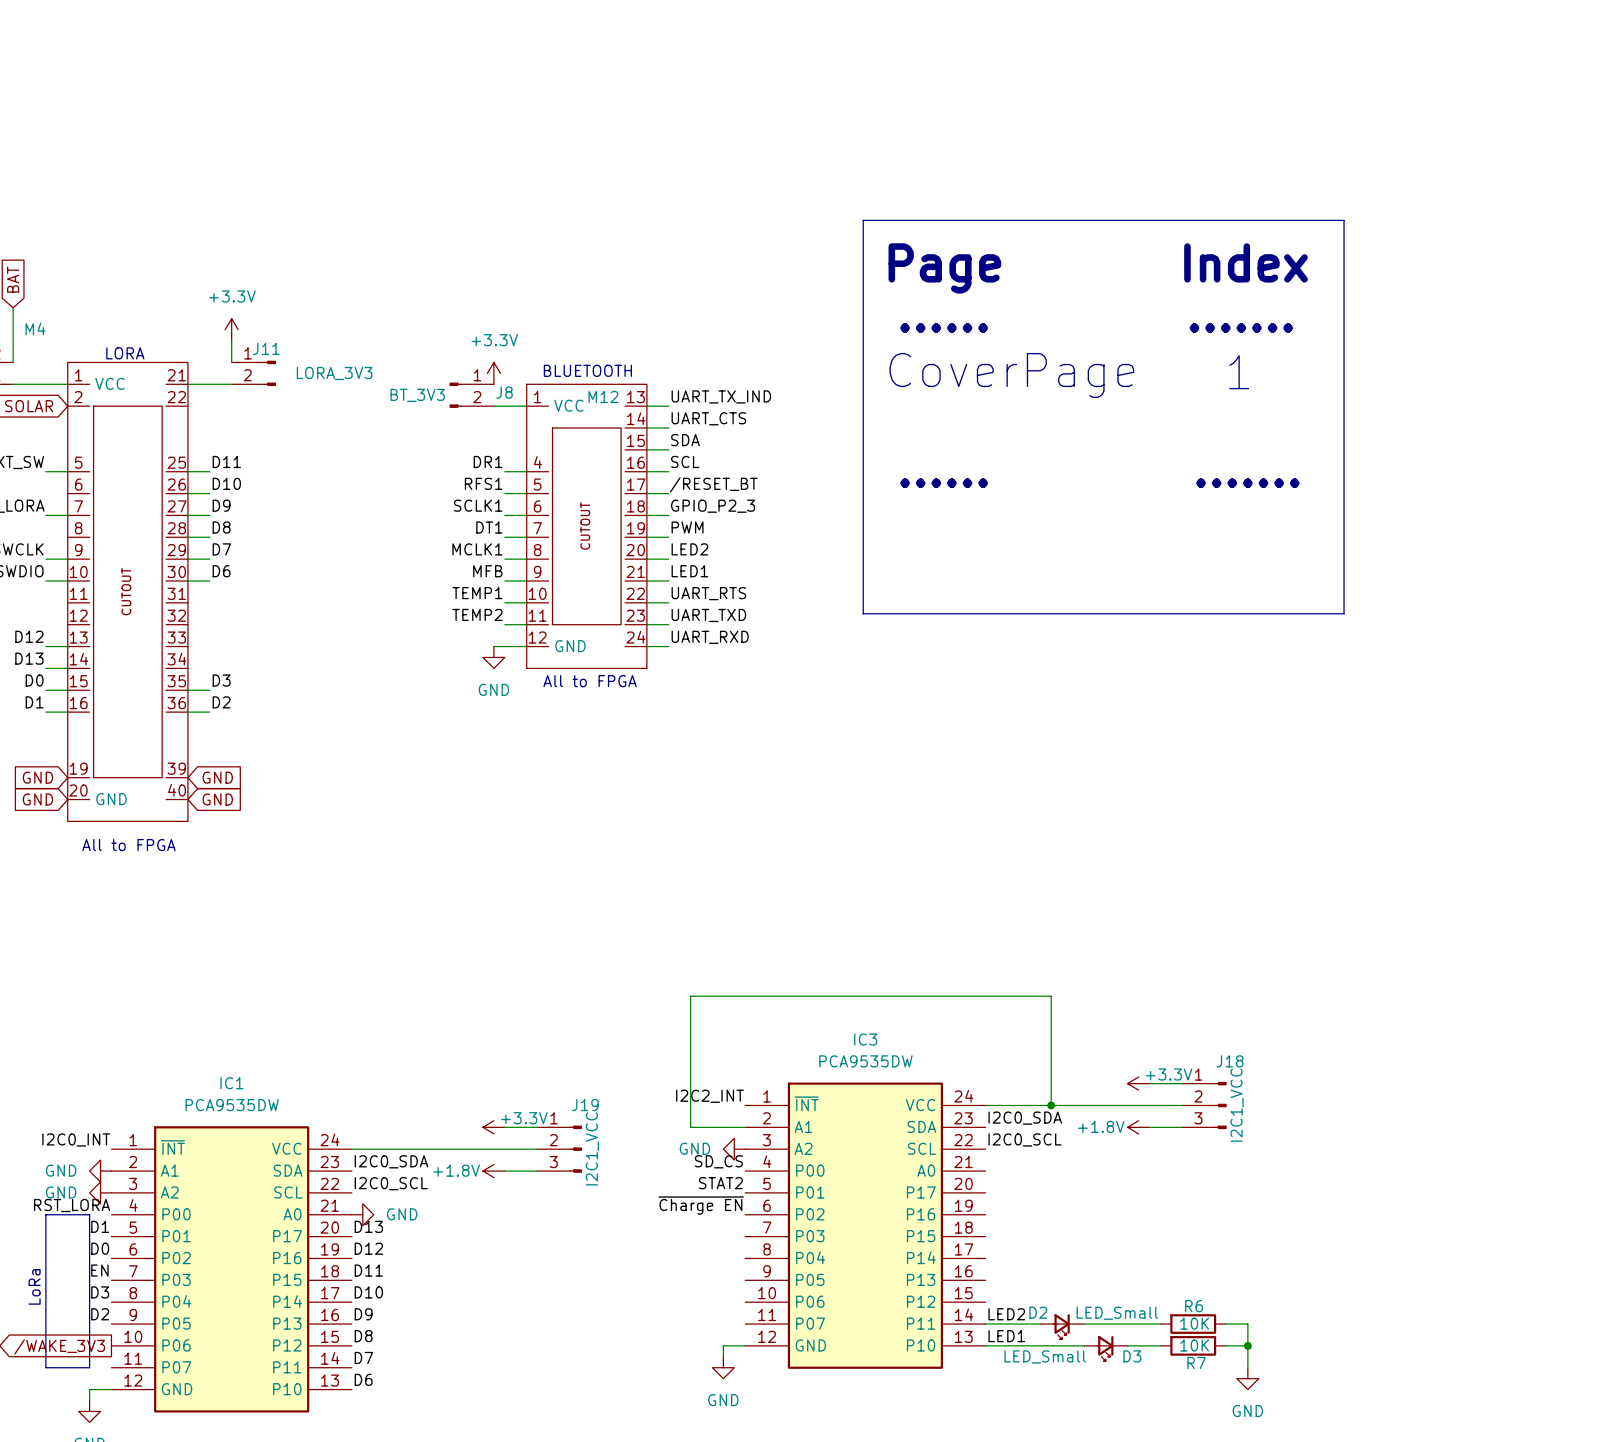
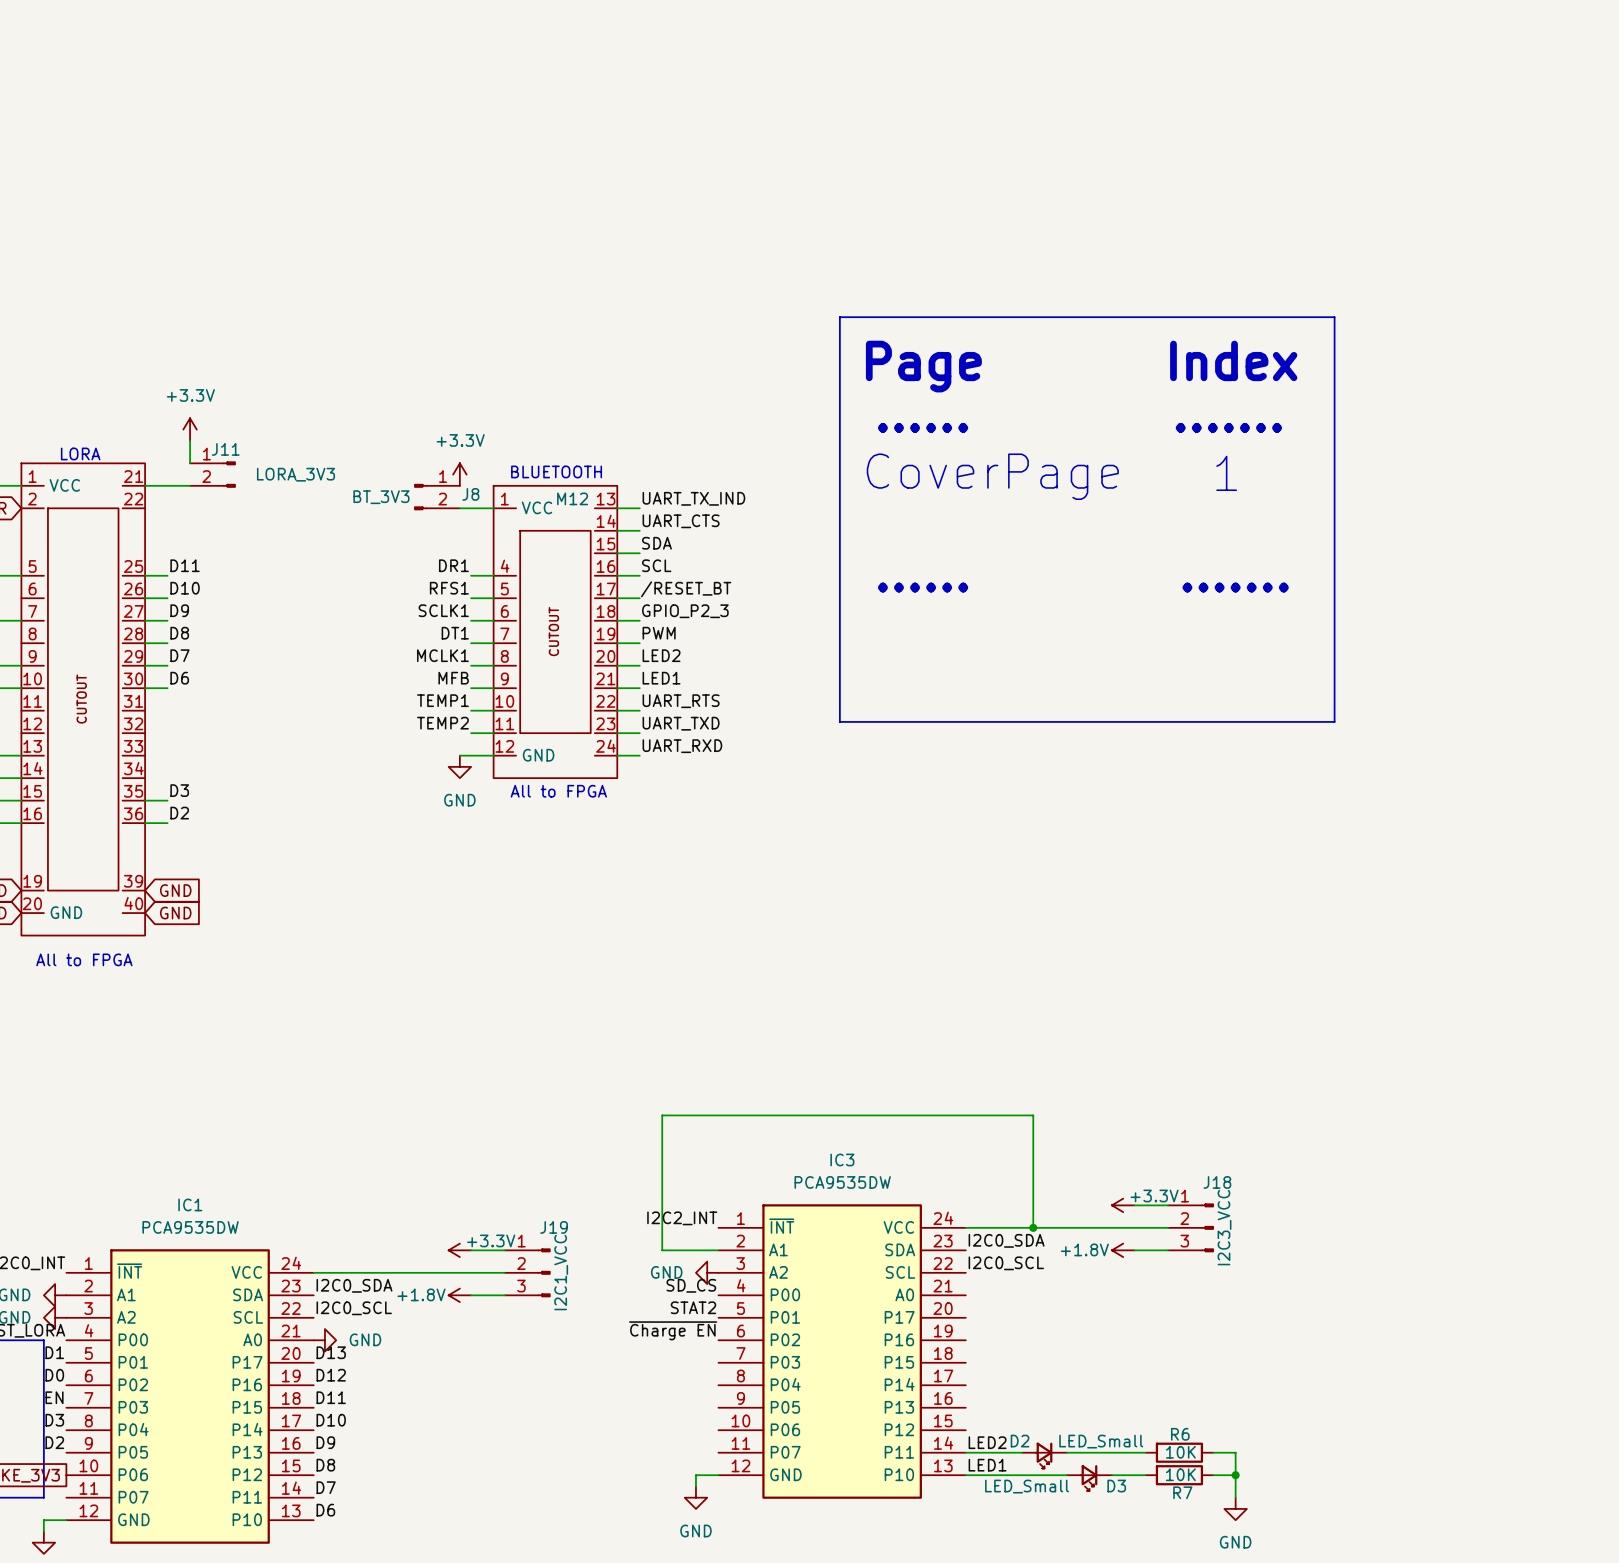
J18 value: I2C1_VCC (1237, 1105) -> I2C3_VCC (1224, 1227)

